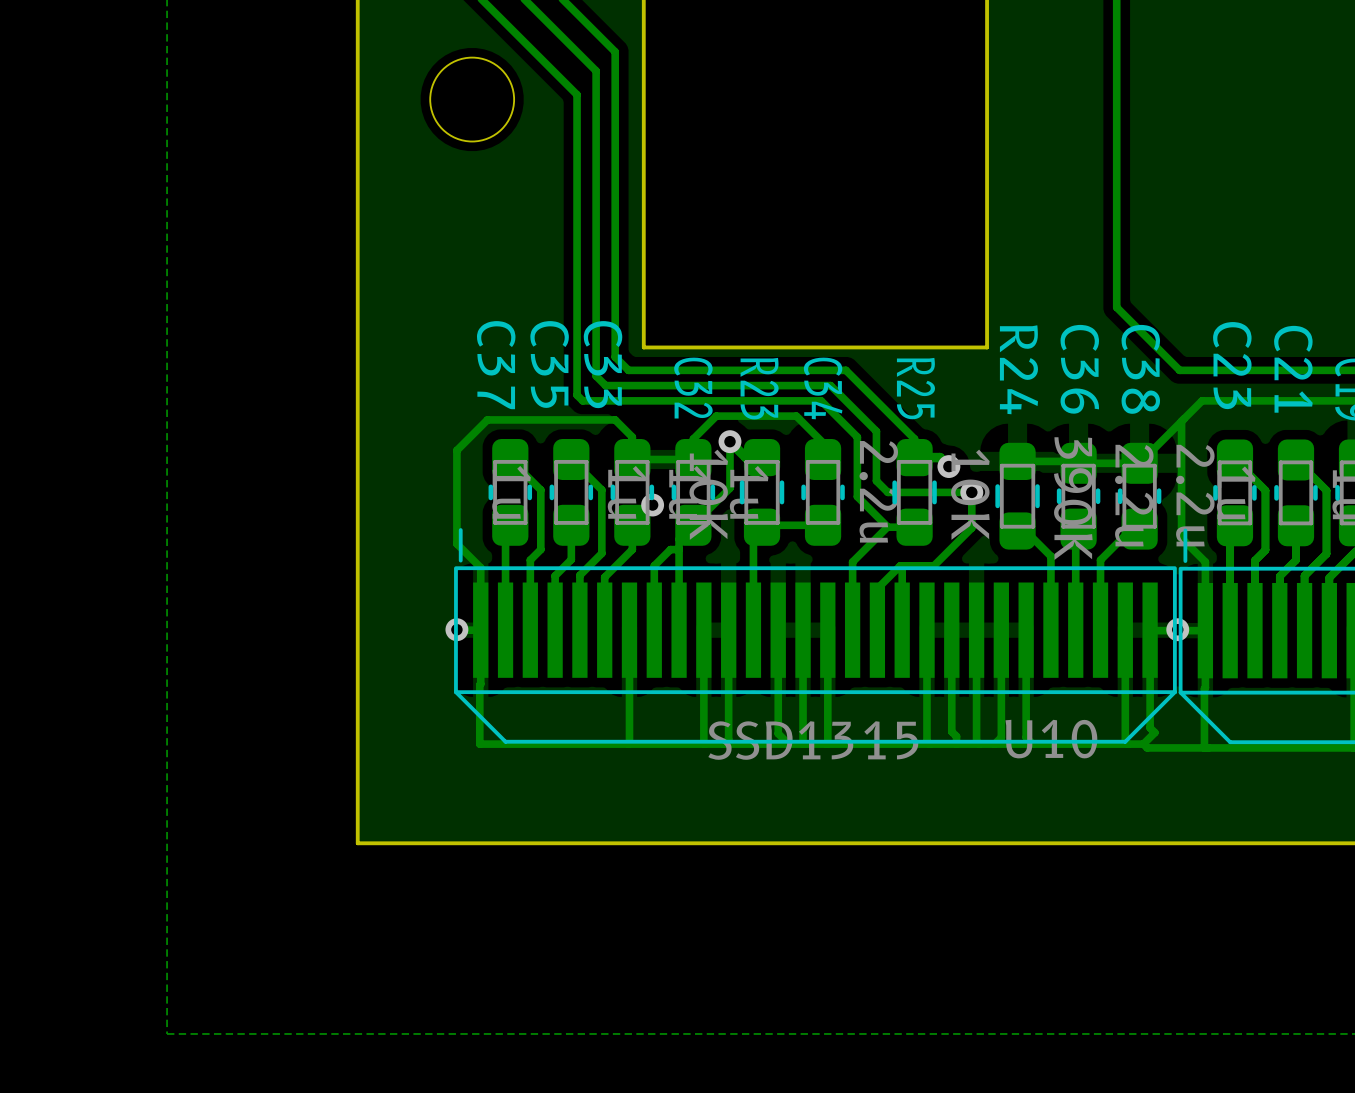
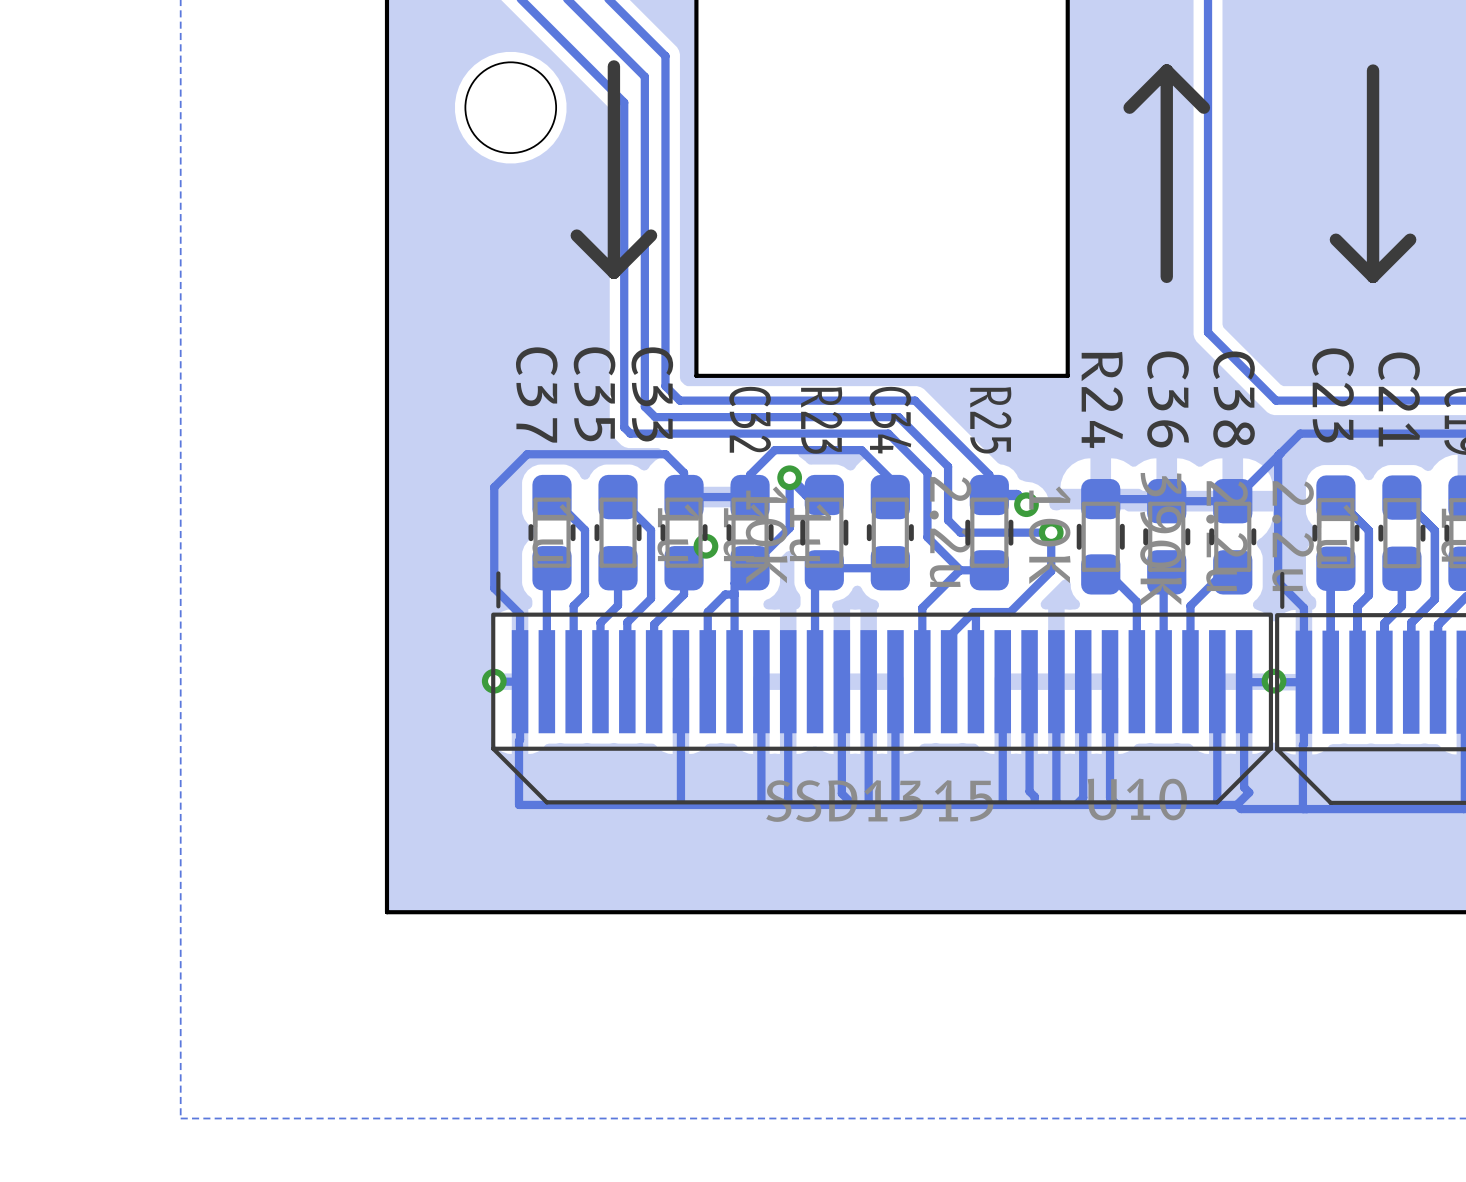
line: none -> (613, 66) (613, 272)
line: none -> (1166, 70) (1166, 276)
line: none -> (1166, 70) (1129, 107)
line: none -> (1166, 70) (1203, 107)
line: none -> (1373, 70) (1373, 276)
line: none -> (576, 235) (613, 272)
line: none -> (651, 235) (613, 272)
line: none -> (1335, 239) (1373, 276)
line: none -> (1410, 239) (1373, 276)

